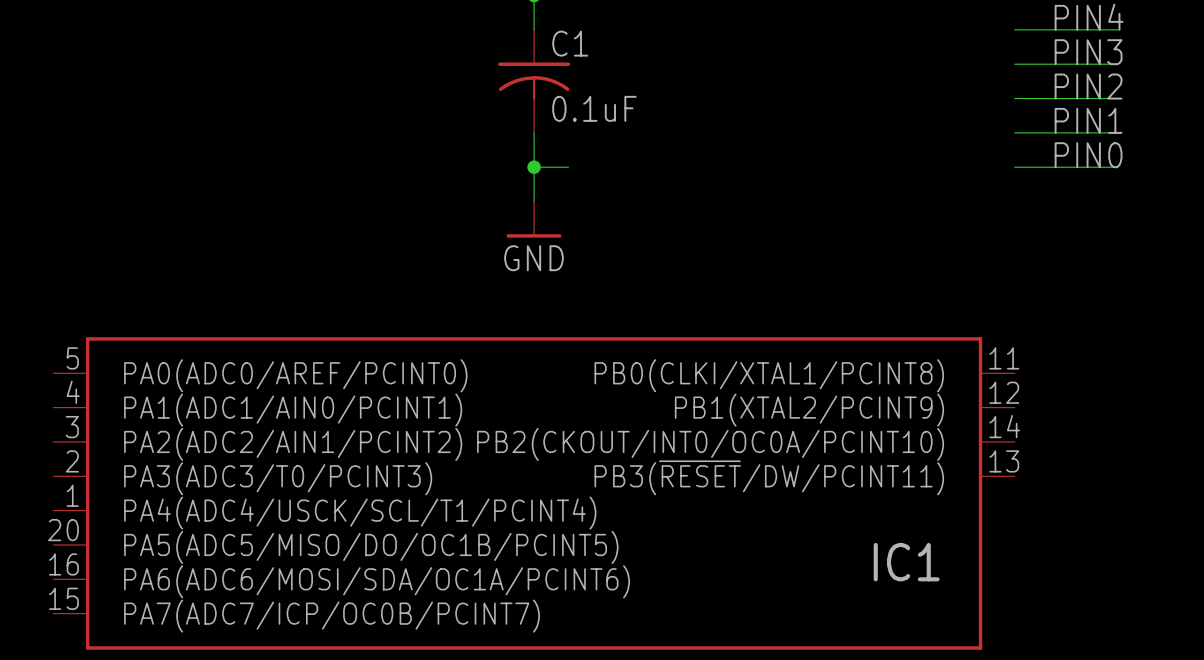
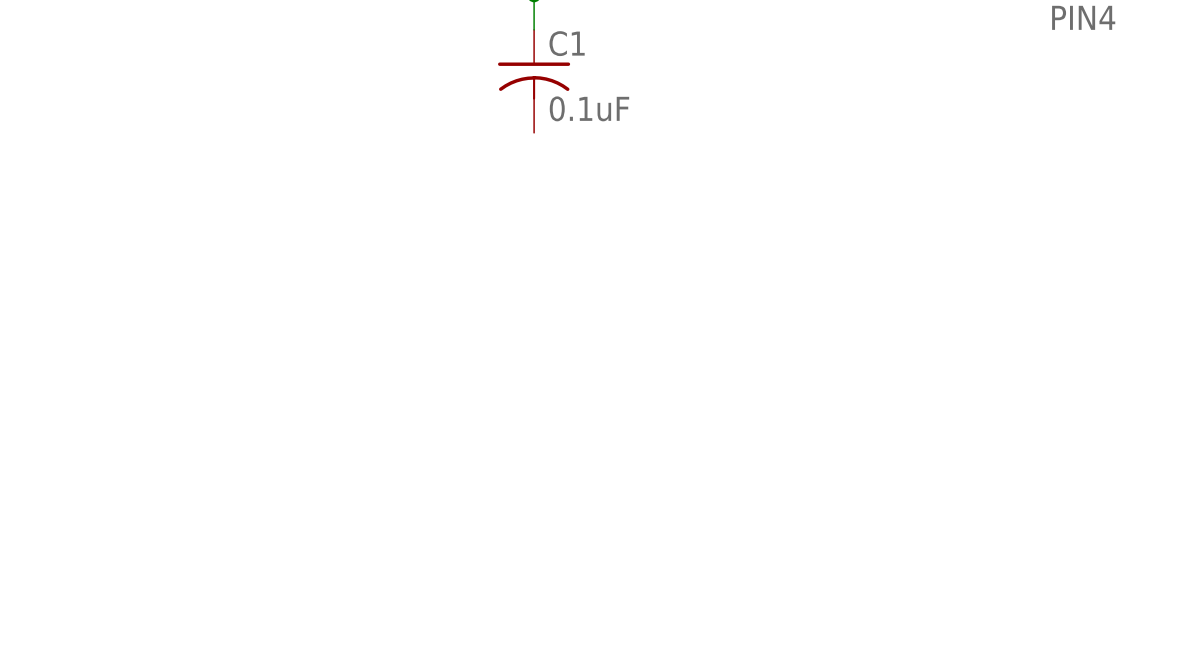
wire: (1014, 29) (1117, 29) -> none
label: PIN3 (1088, 52) -> none
wire: (1014, 64) (1117, 64) -> none
label: PIN2 (1088, 86) -> none
wire: (1014, 98) (1117, 98) -> none
label: PIN1 (1088, 120) -> none
wire: (534, 132) (534, 201) -> none
wire: (1014, 132) (1117, 132) -> none
label: PIN0 (1088, 155) -> none
wire: (534, 167) (568, 167) -> none
junction: (534, 167) -> none
wire: (1014, 167) (1117, 167) -> none
power symbol: GND (534, 219) -> none
IC1: (534, 493) -> none

